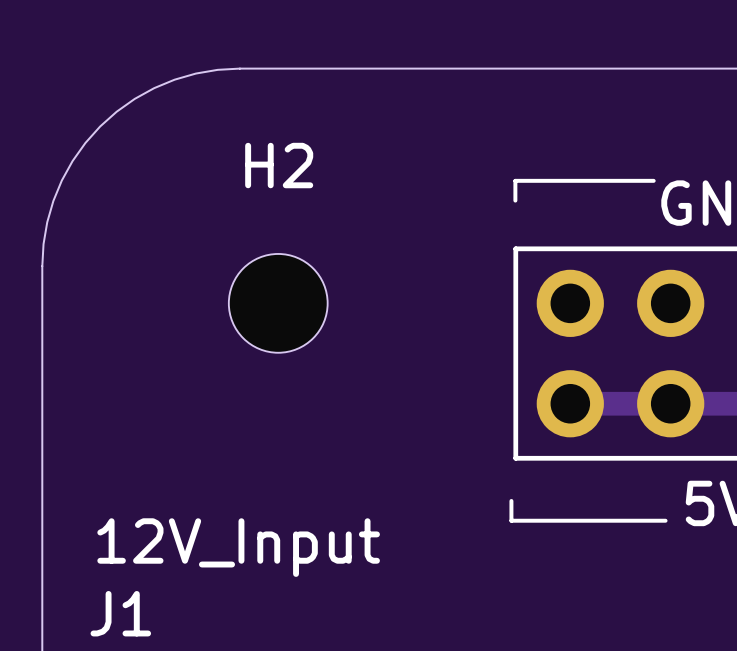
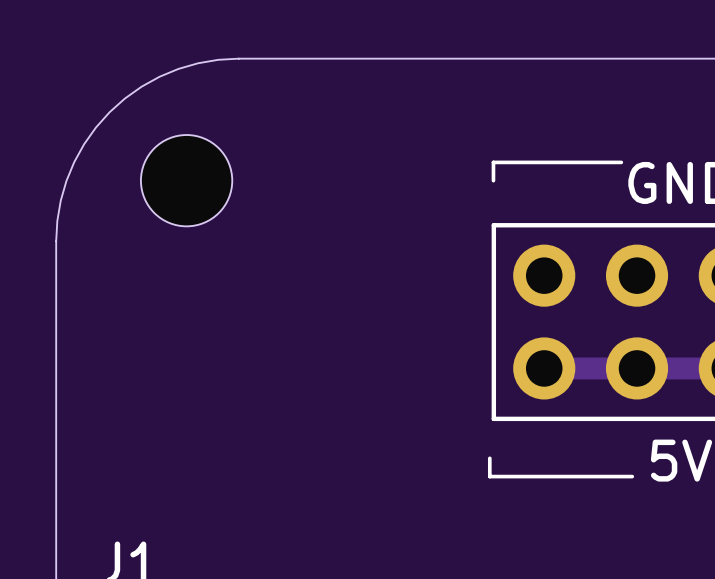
part: none -> (186, 180)
H2: (278, 303) -> none
J1 value: 12V_Input (238, 547) -> none

